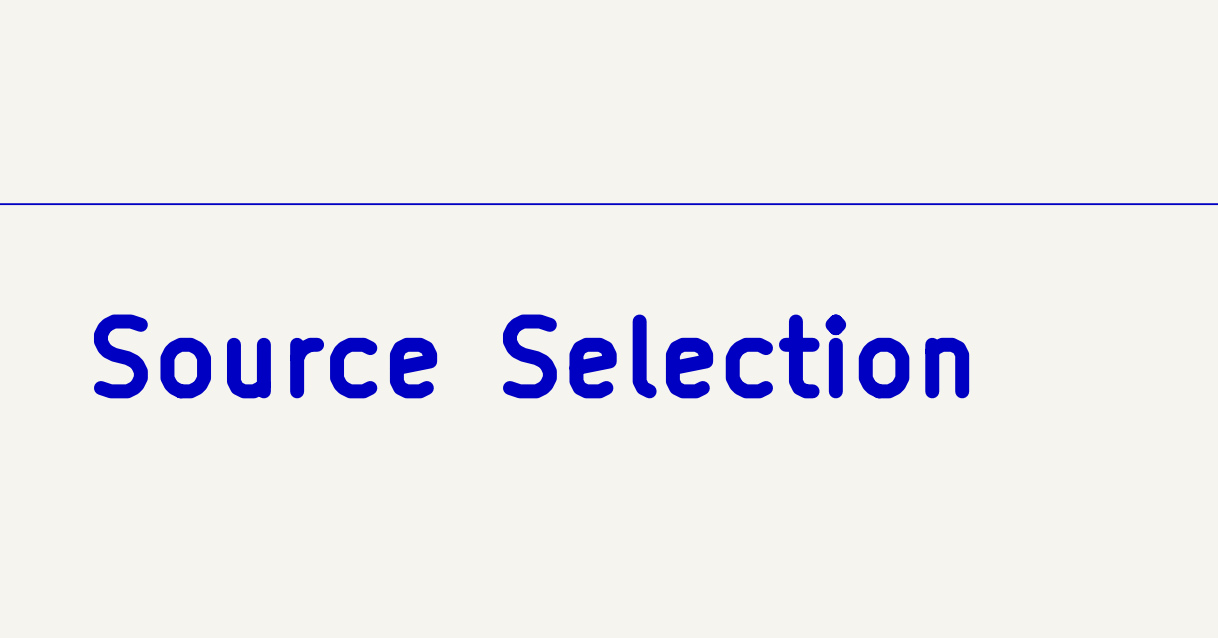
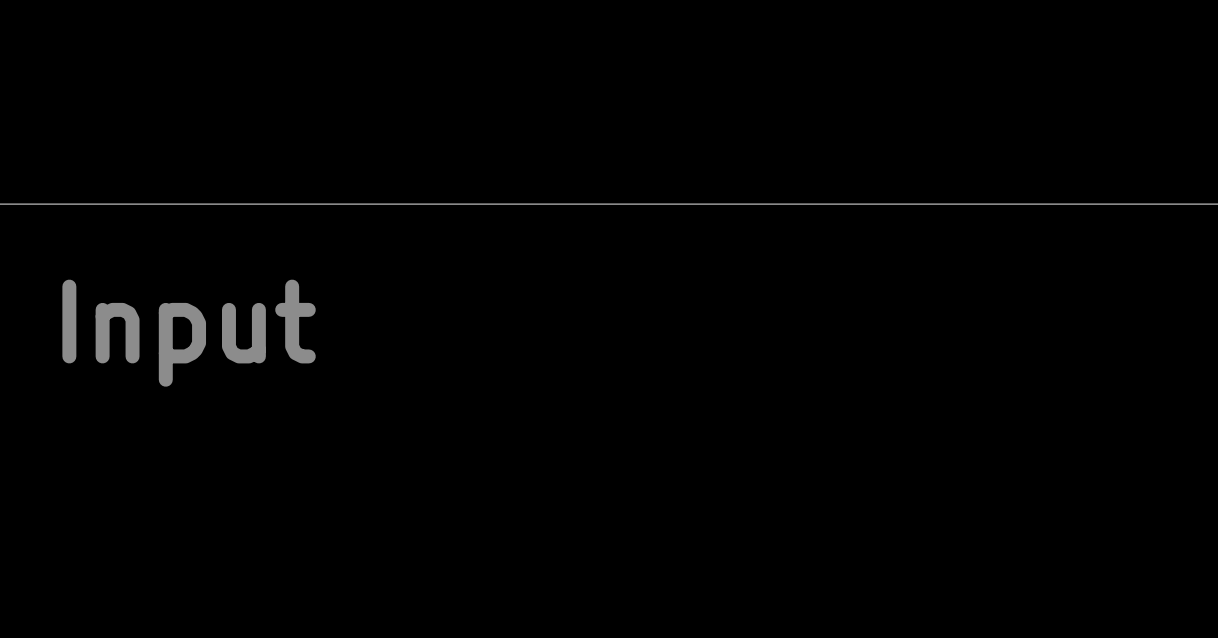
text: Source Selection (531, 356) -> Input (189, 333)

